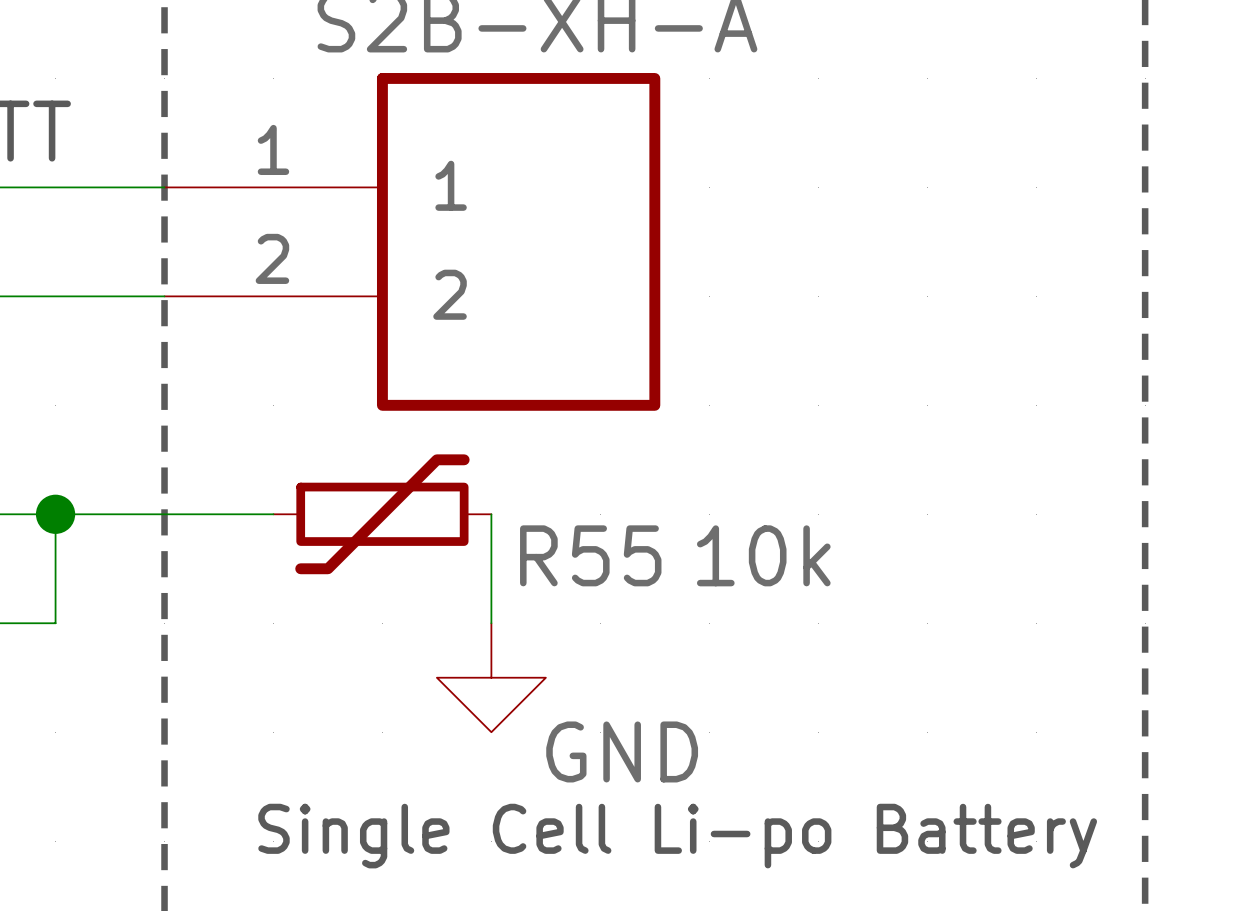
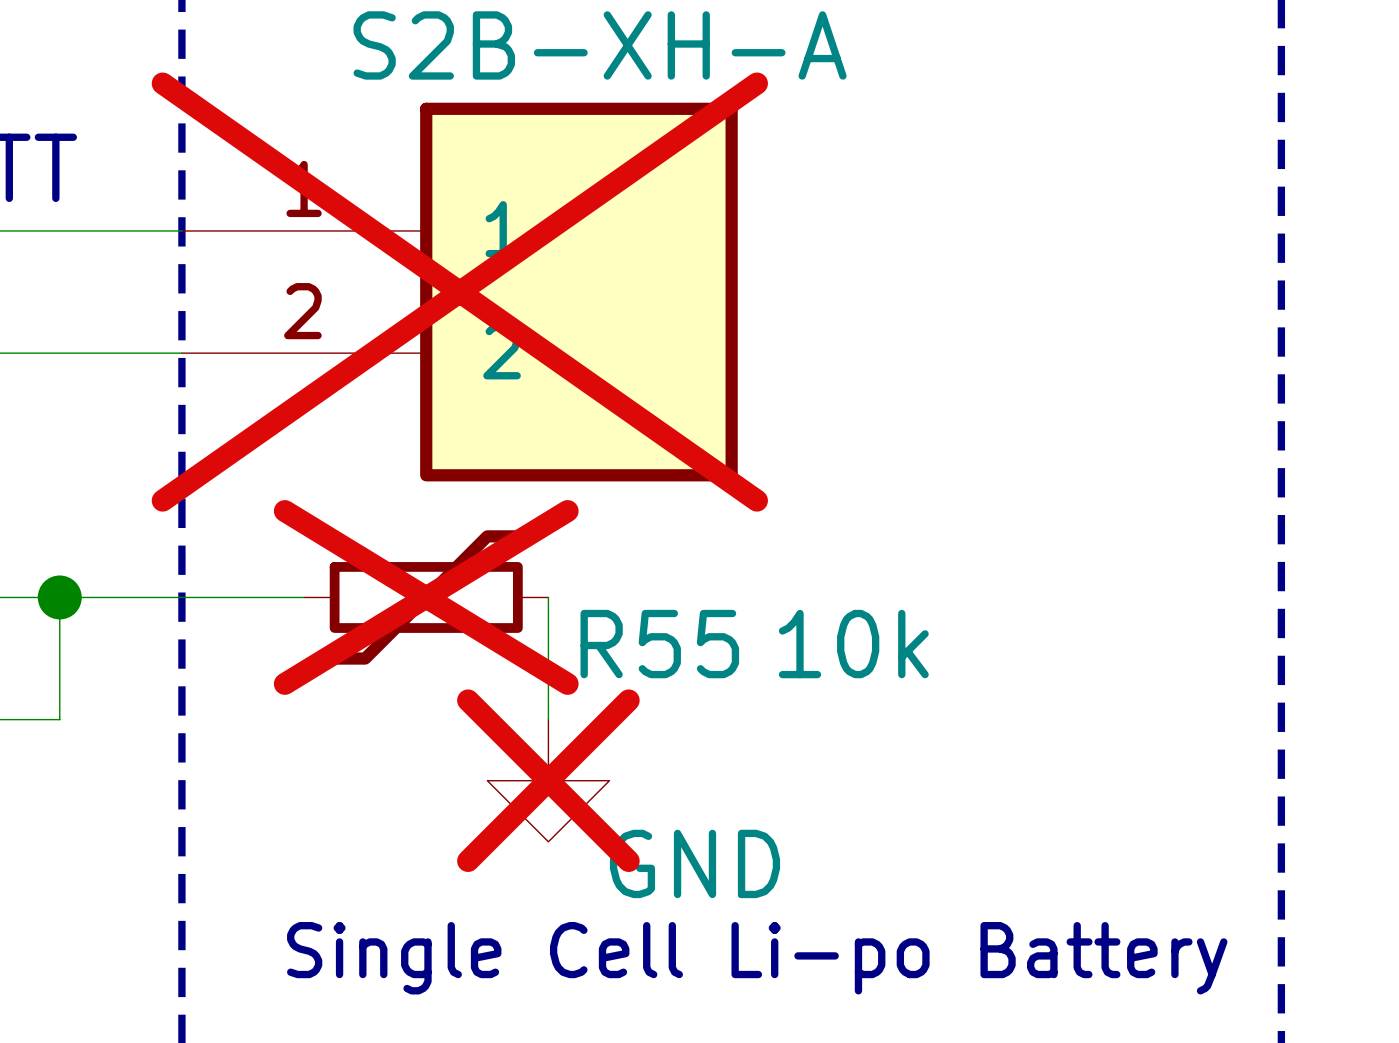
part do-not-place cross: none -> (459, 292)
R55 do-not-place cross: none -> (426, 597)
power symbol do-not-place cross: none -> (548, 780)

